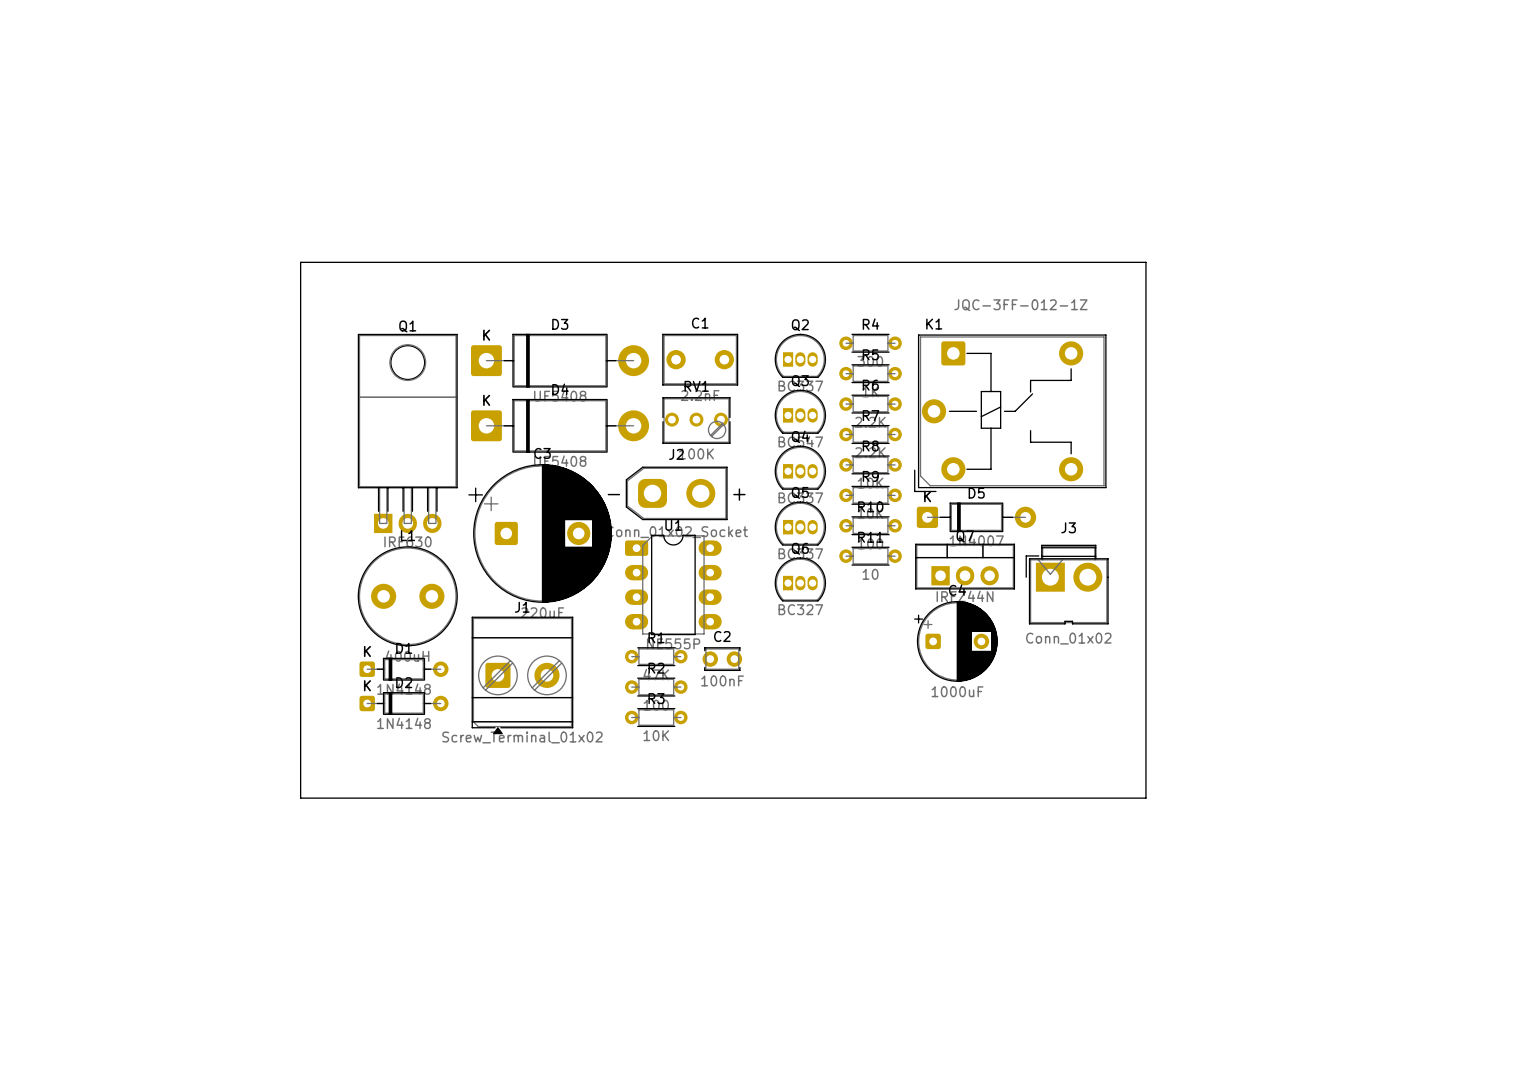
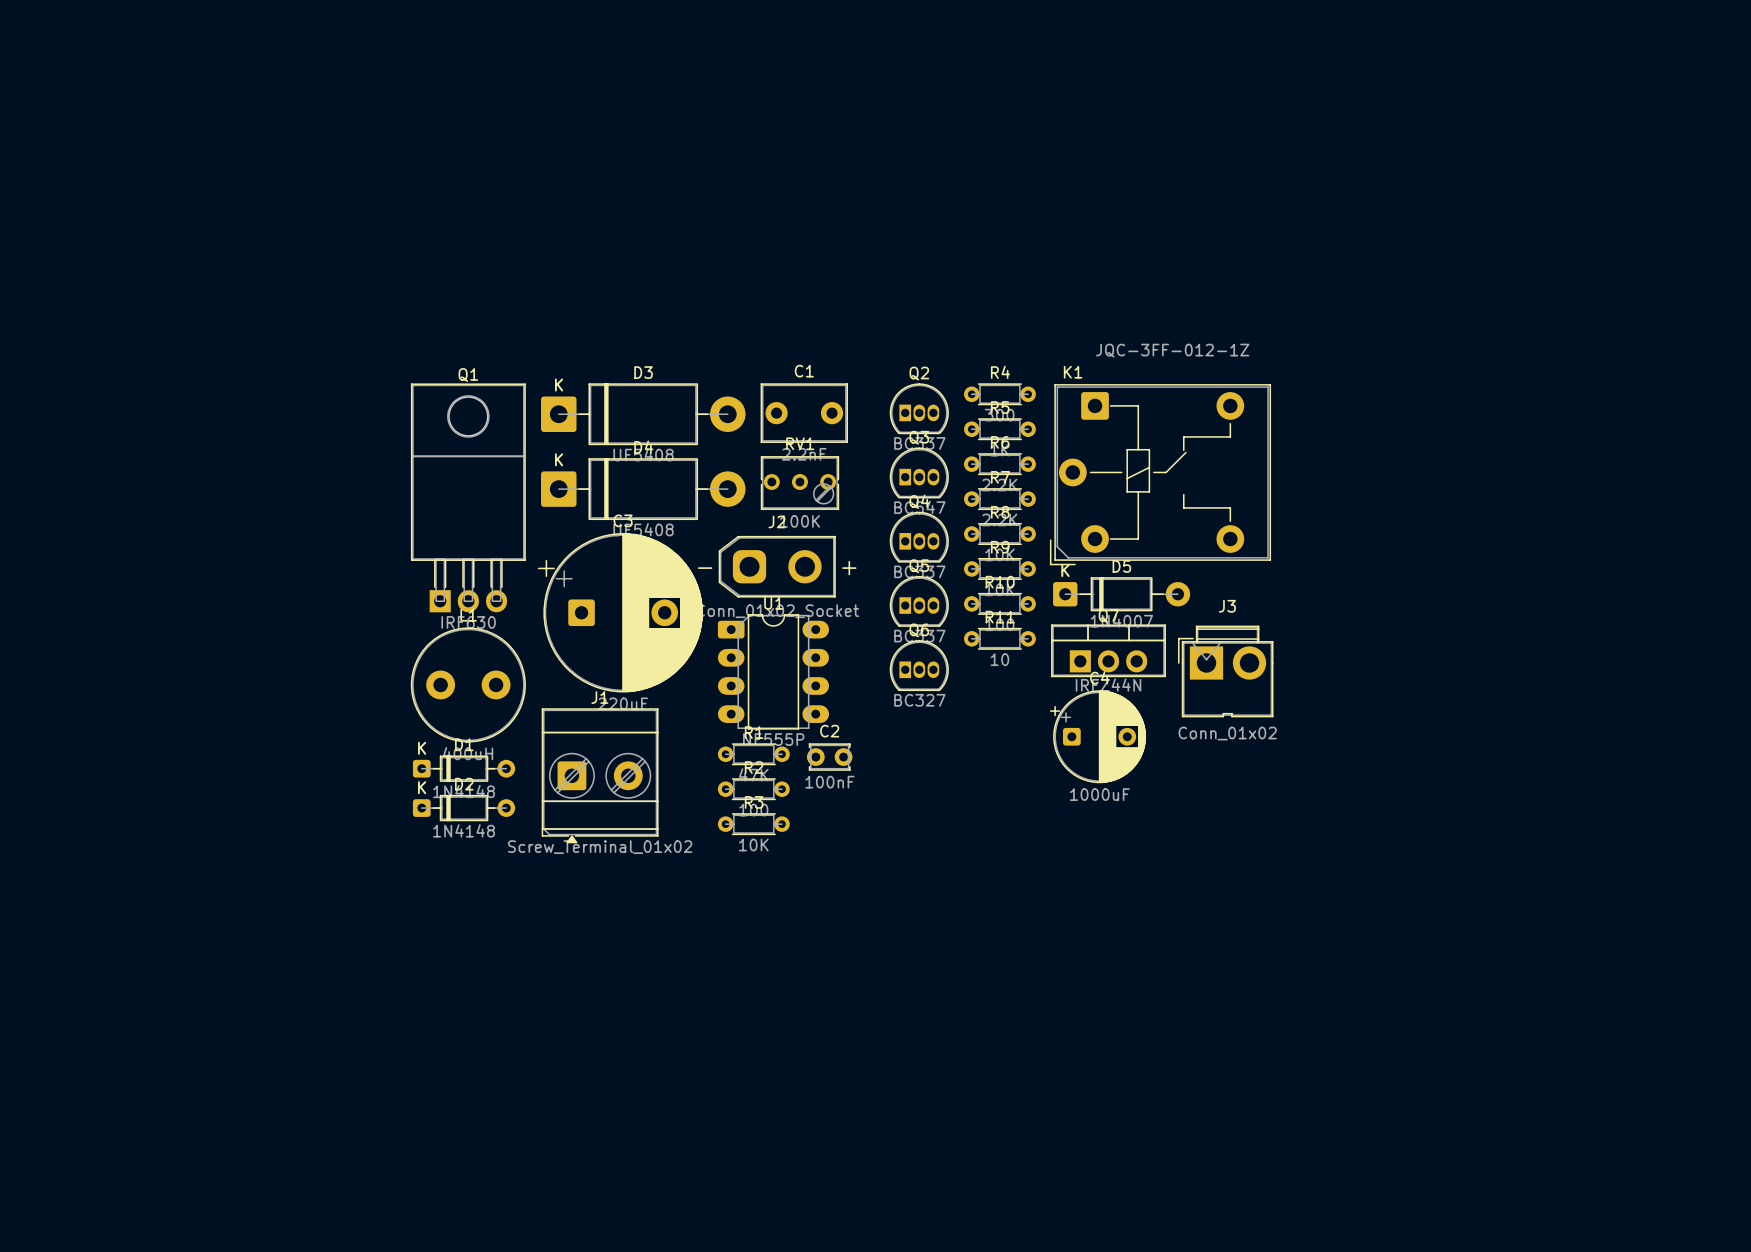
board edge: (300, 262) (1145, 262) (1145, 798) (300, 798) (300, 262) -> none

